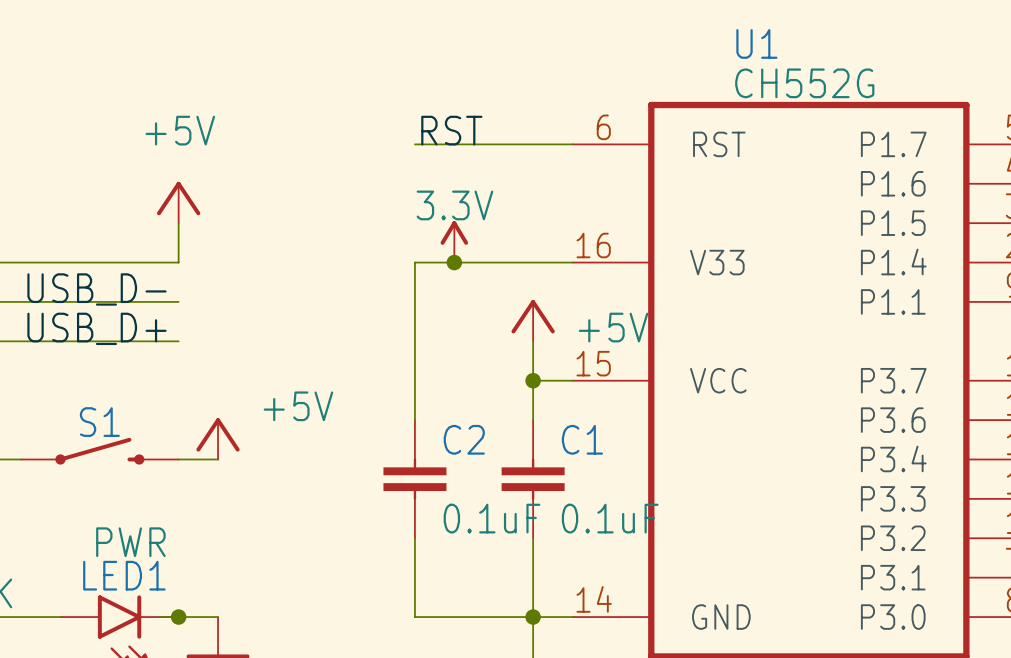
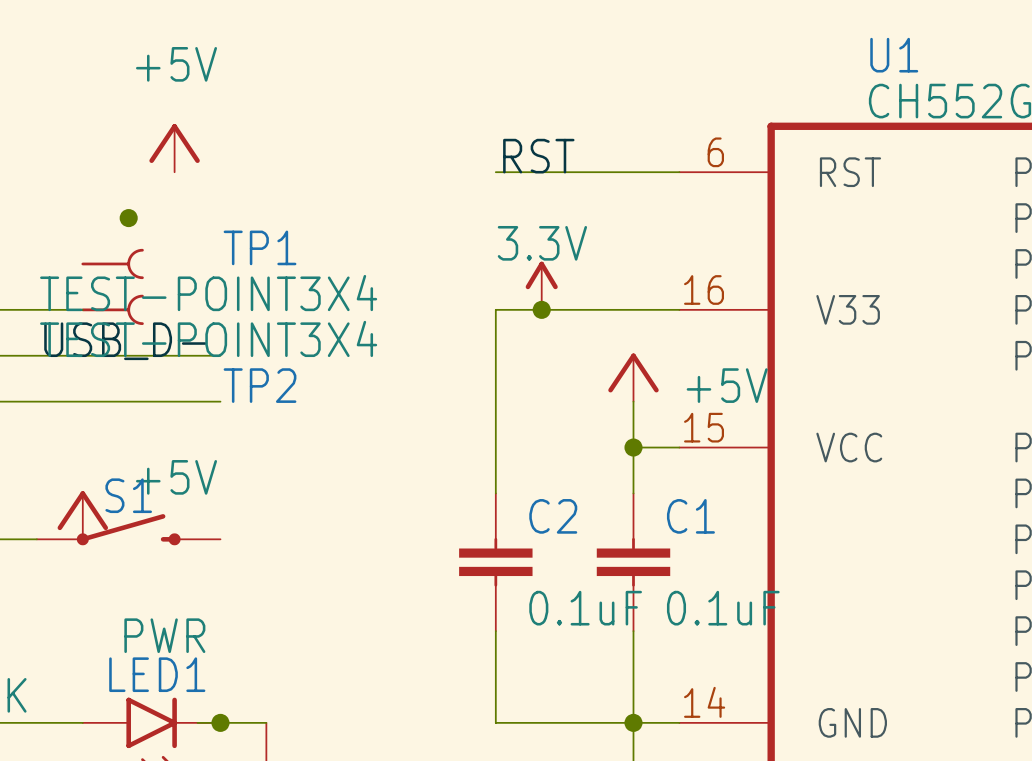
junction: none -> (128, 218)
power symbol position: +5V (178, 202) -> +5V (174, 148)
TP1: none -> TEST-POINT3X4 (112, 263)
wire: (178, 223) (178, 262) (60, 262) -> none
TP2: none -> TEST-POINT3X4 (112, 309)
label: USB_D+ (96, 328) -> none
power symbol: none -> +5V (82, 515)
power symbol: +5V (218, 438) -> none
wire: (178, 459) (218, 459) -> none

